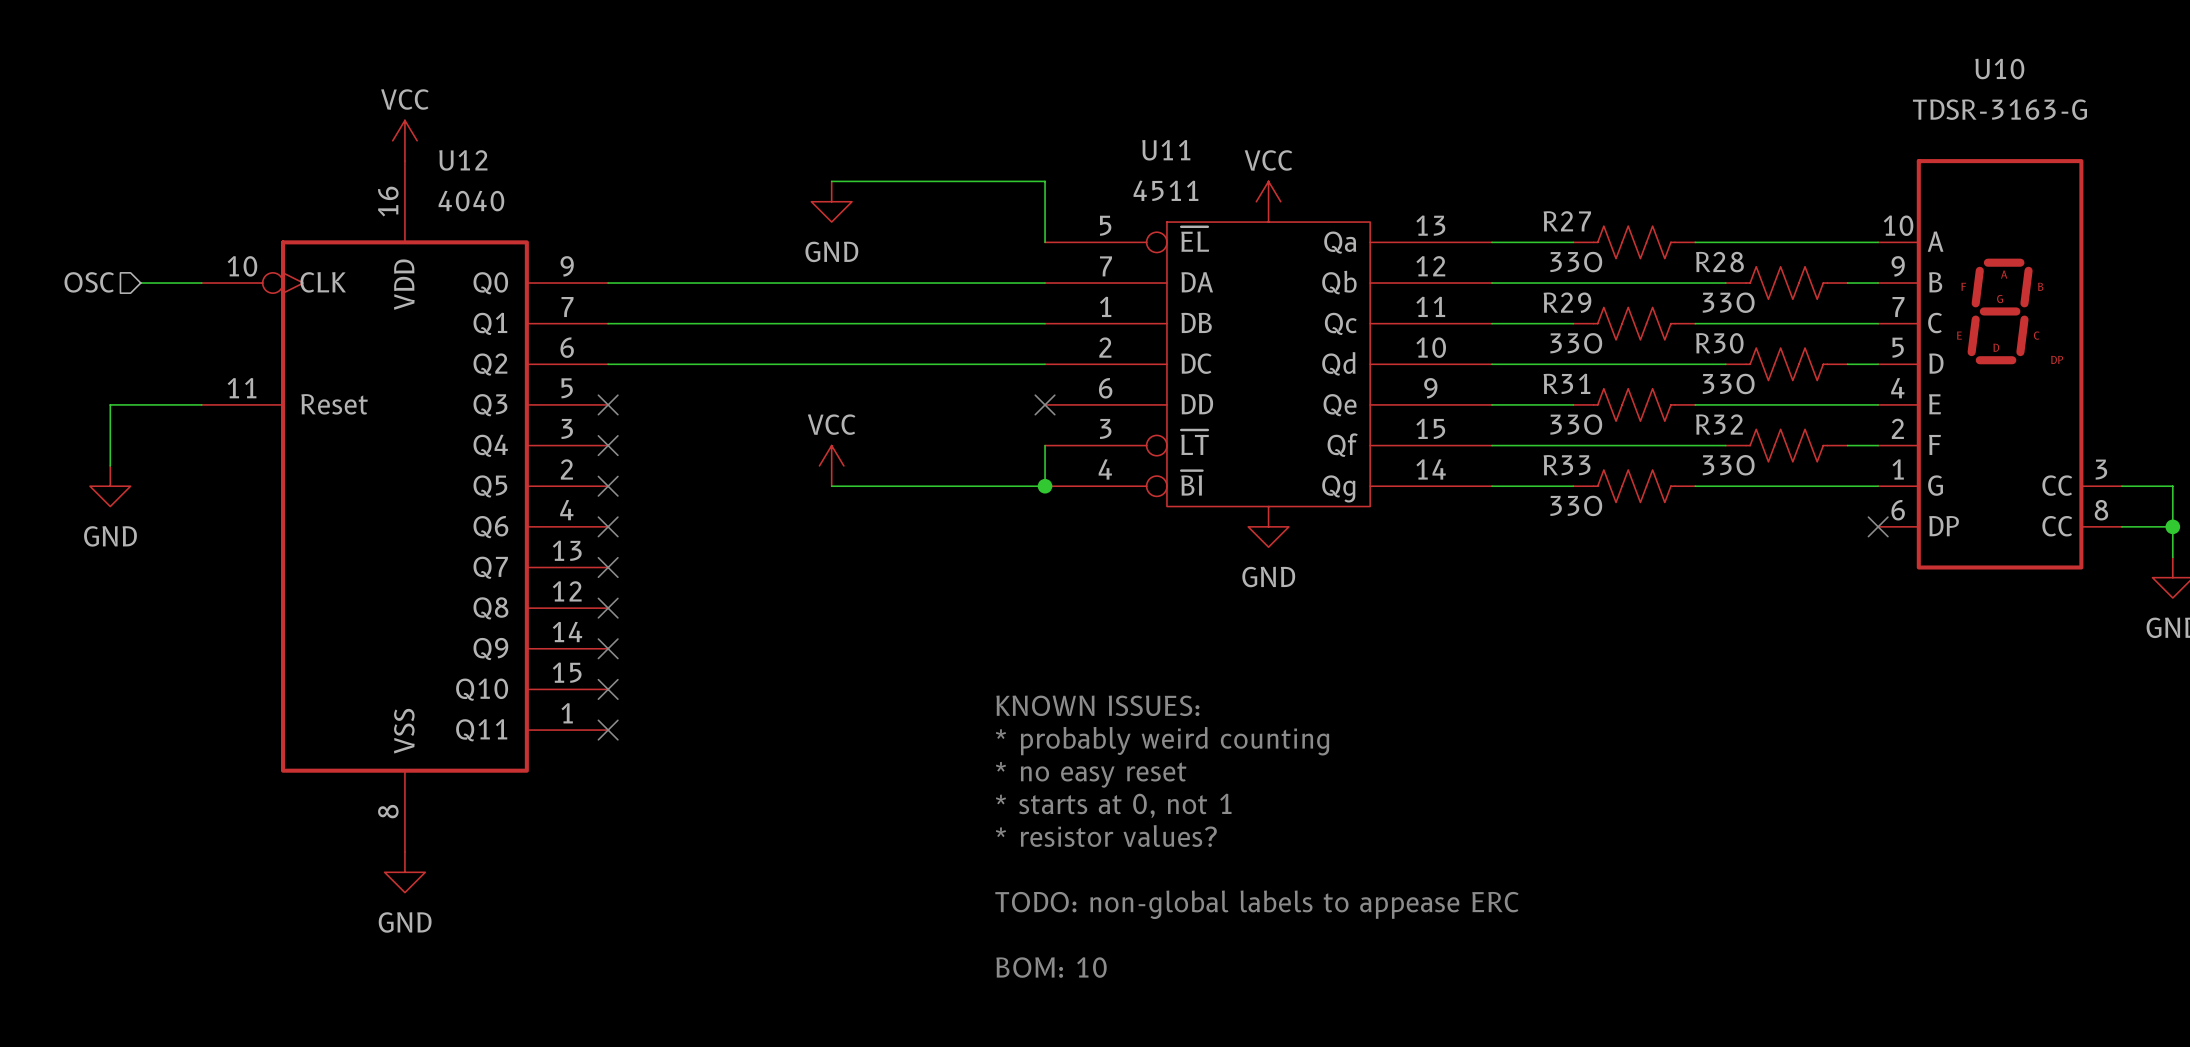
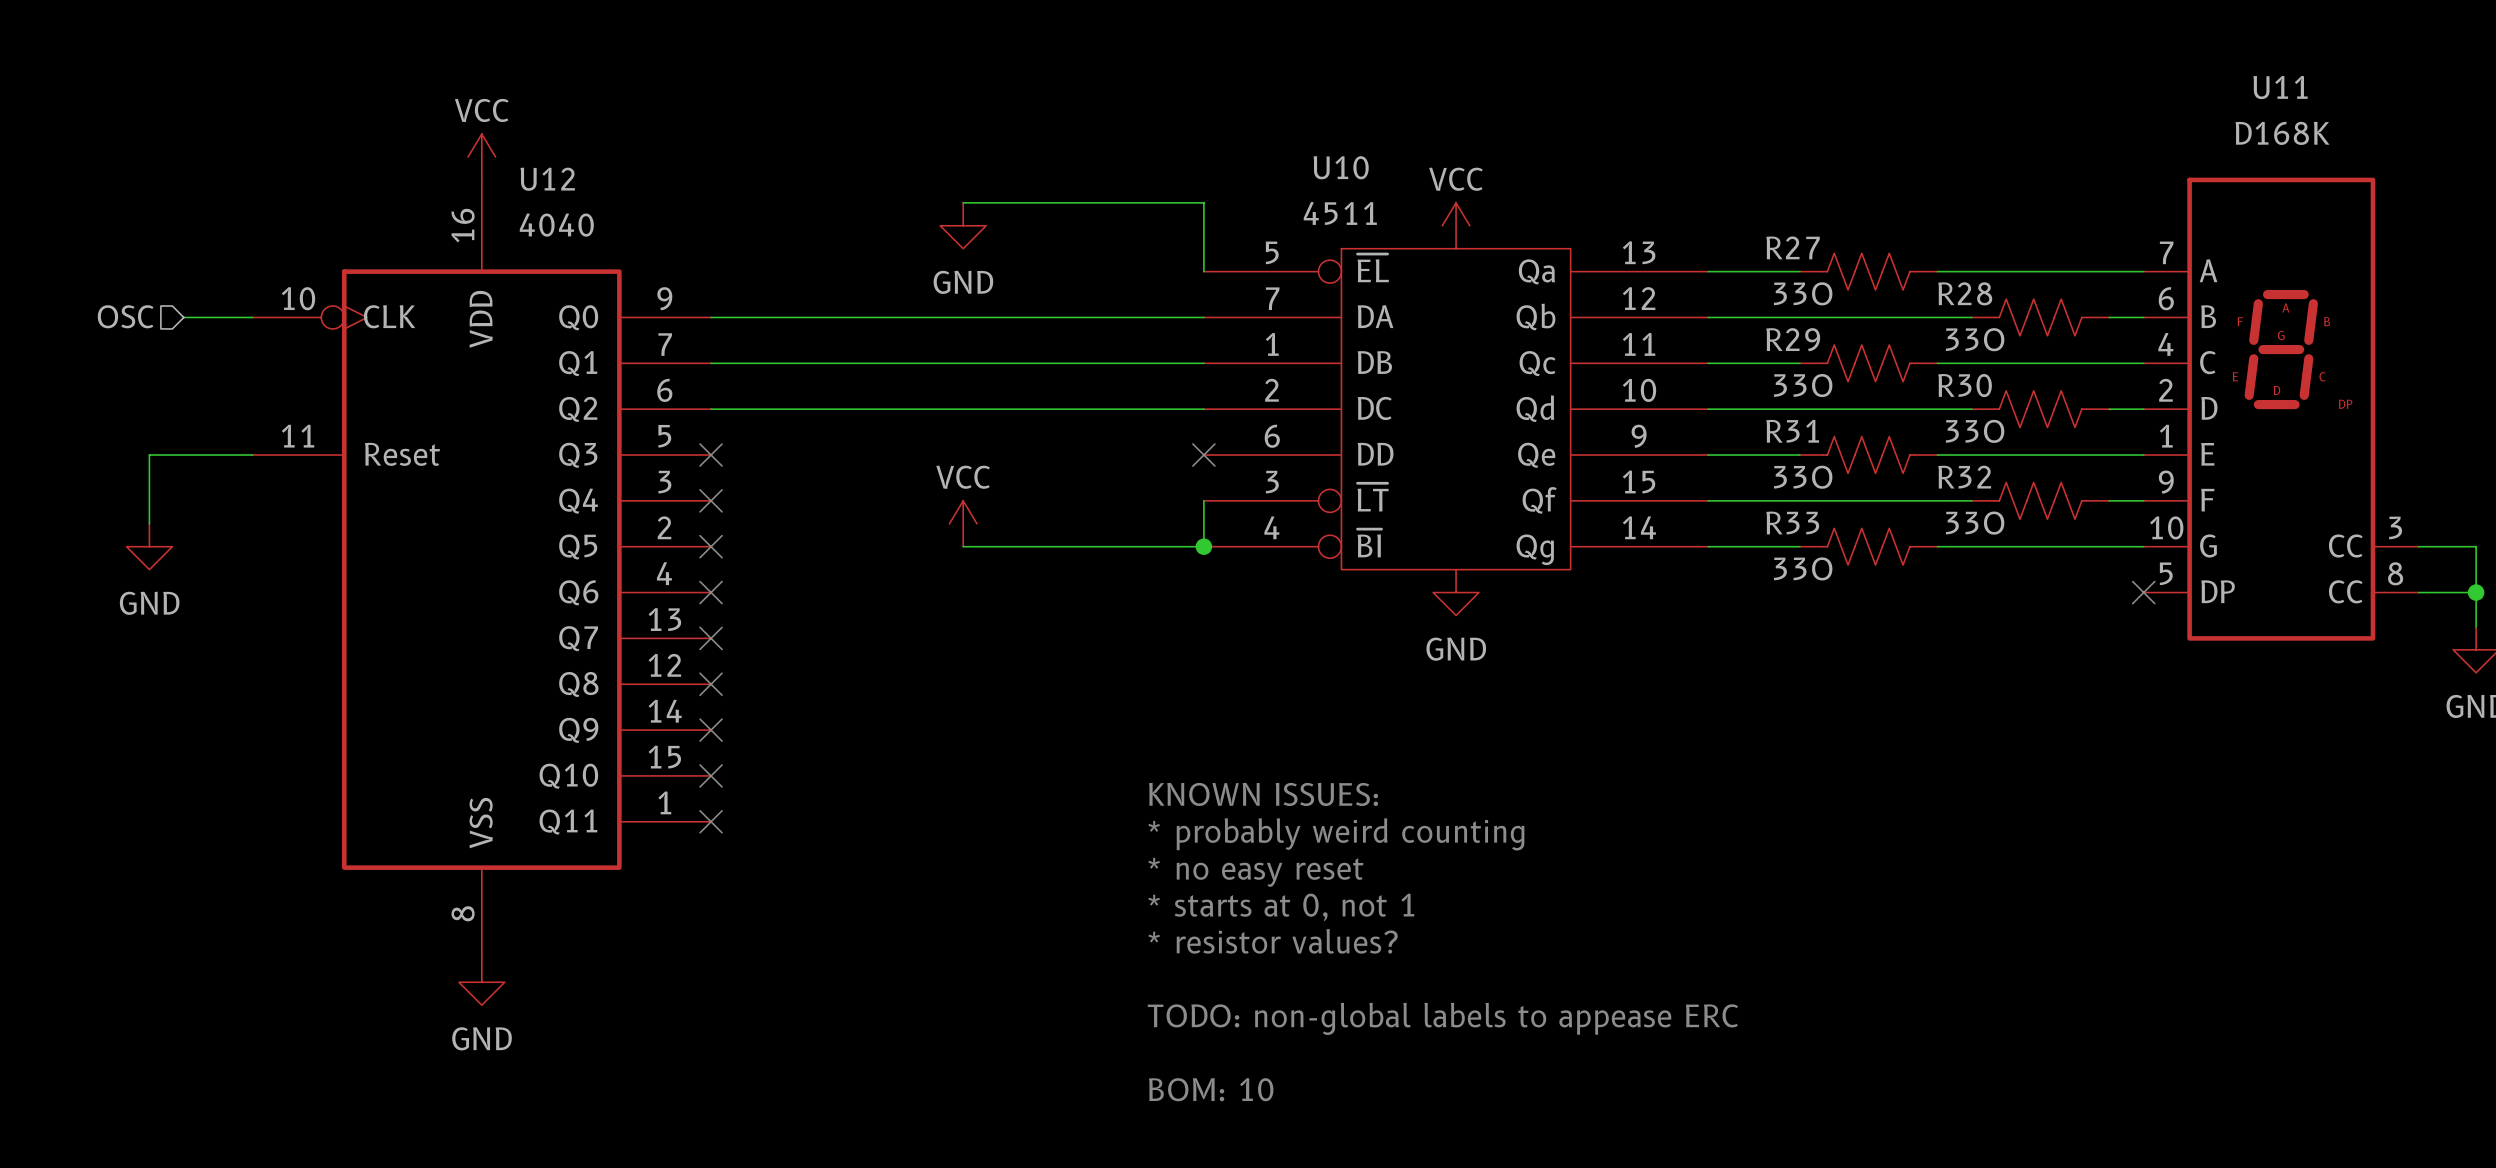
U10 name: U10 (1999, 69) -> U11 (2280, 87)
U10 value: TDSR-3163-G (1999, 109) -> D168K (2282, 133)
U11 name: U11 (1166, 150) -> U10 (1341, 167)
U10 pin number: 10 (1898, 225) -> 7 (2166, 252)
U10 pin number: 9 (1898, 266) -> 6 (2166, 298)
U10 pin number: 7 (1898, 307) -> 4 (2165, 344)
U10 pin number: 5 (1898, 347) -> 2 (2165, 390)
U10 pin number: 4 (1897, 388) -> 1 (2166, 436)
U10 pin number: 2 (1897, 428) -> 9 (2166, 482)
U10 pin number: 1 (1898, 469) -> 10 (2166, 527)
U10 pin number: 6 (1898, 510) -> 5 (2166, 573)

